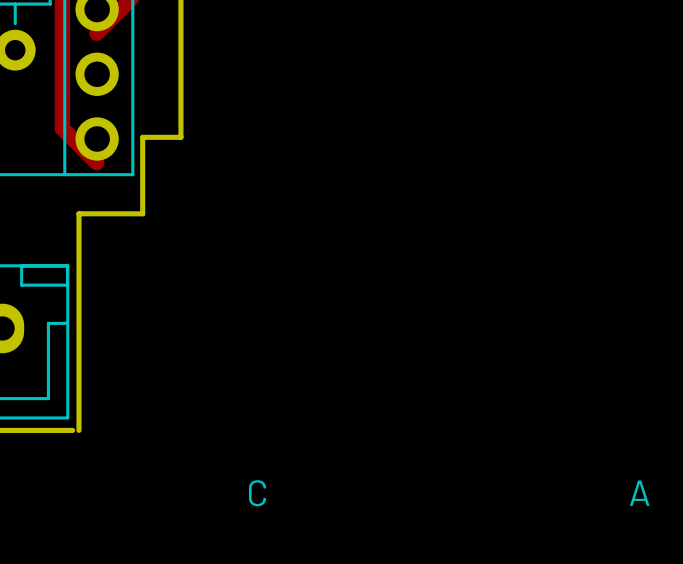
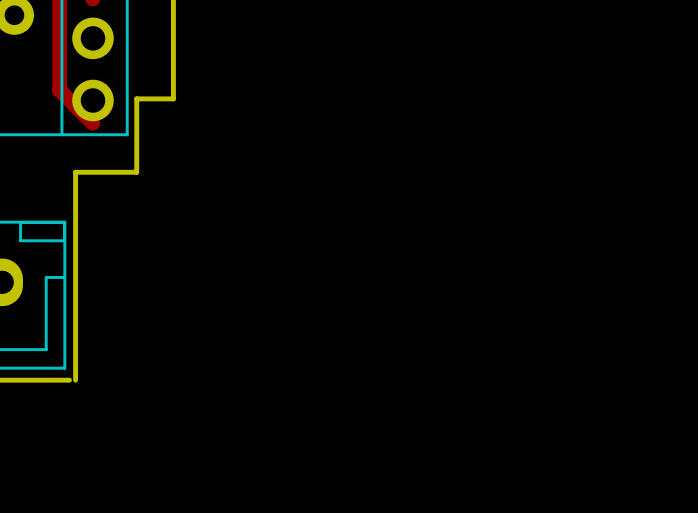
text: C (257, 493) -> none
text: A (639, 493) -> none

